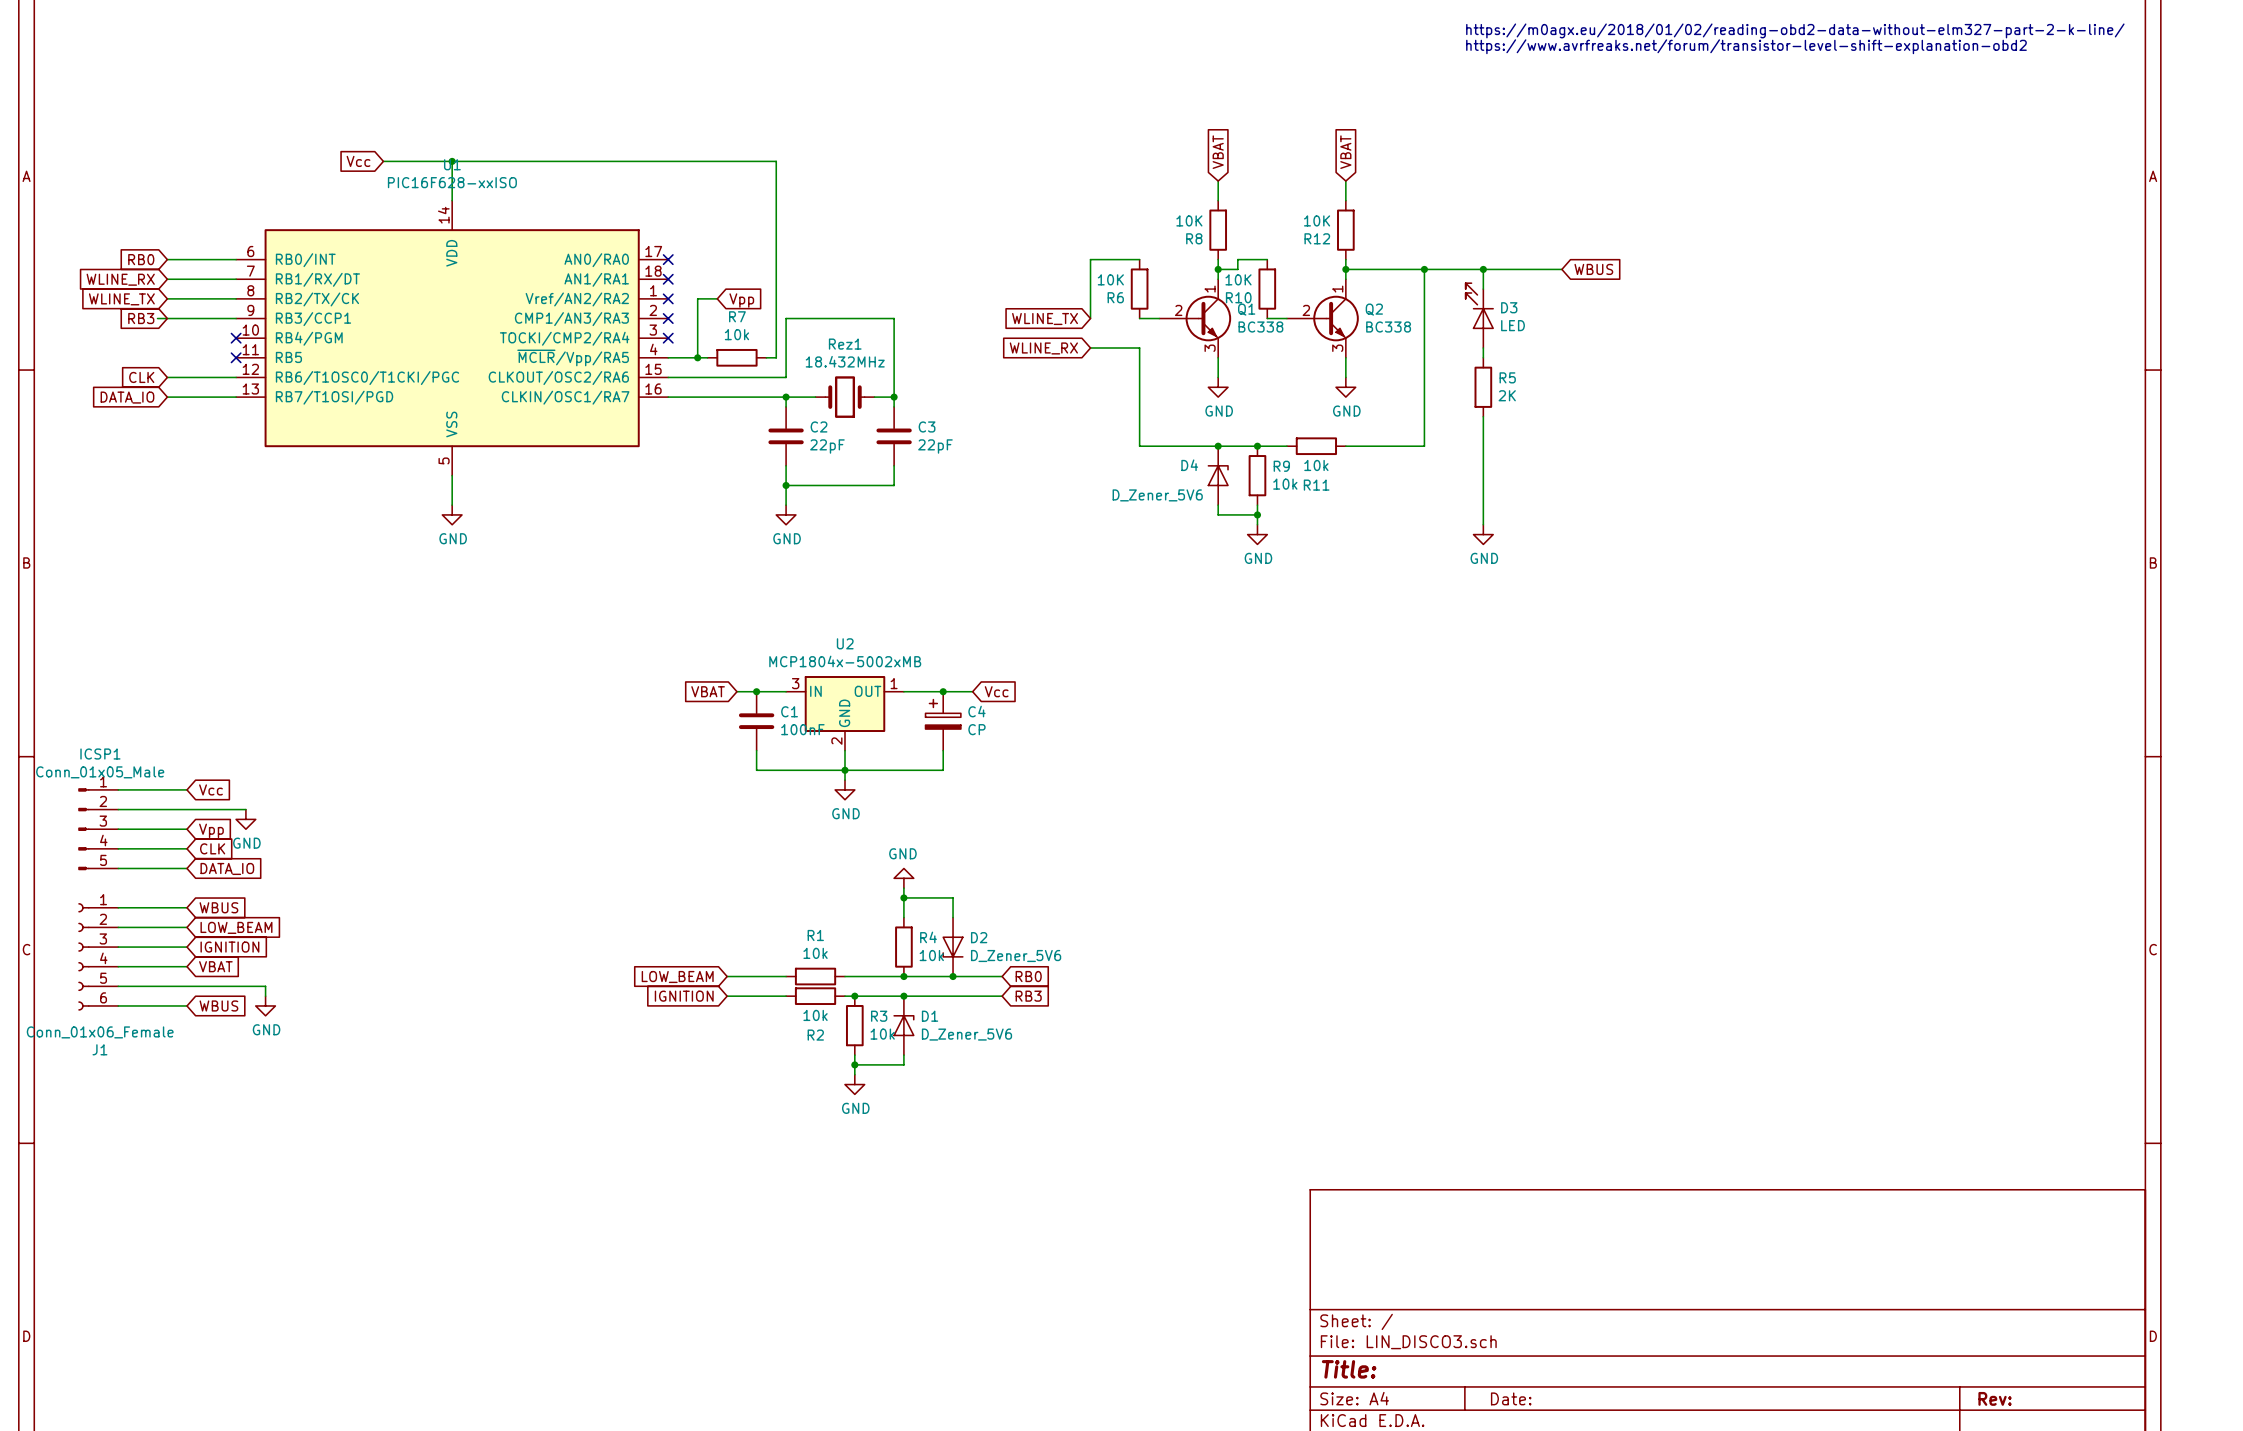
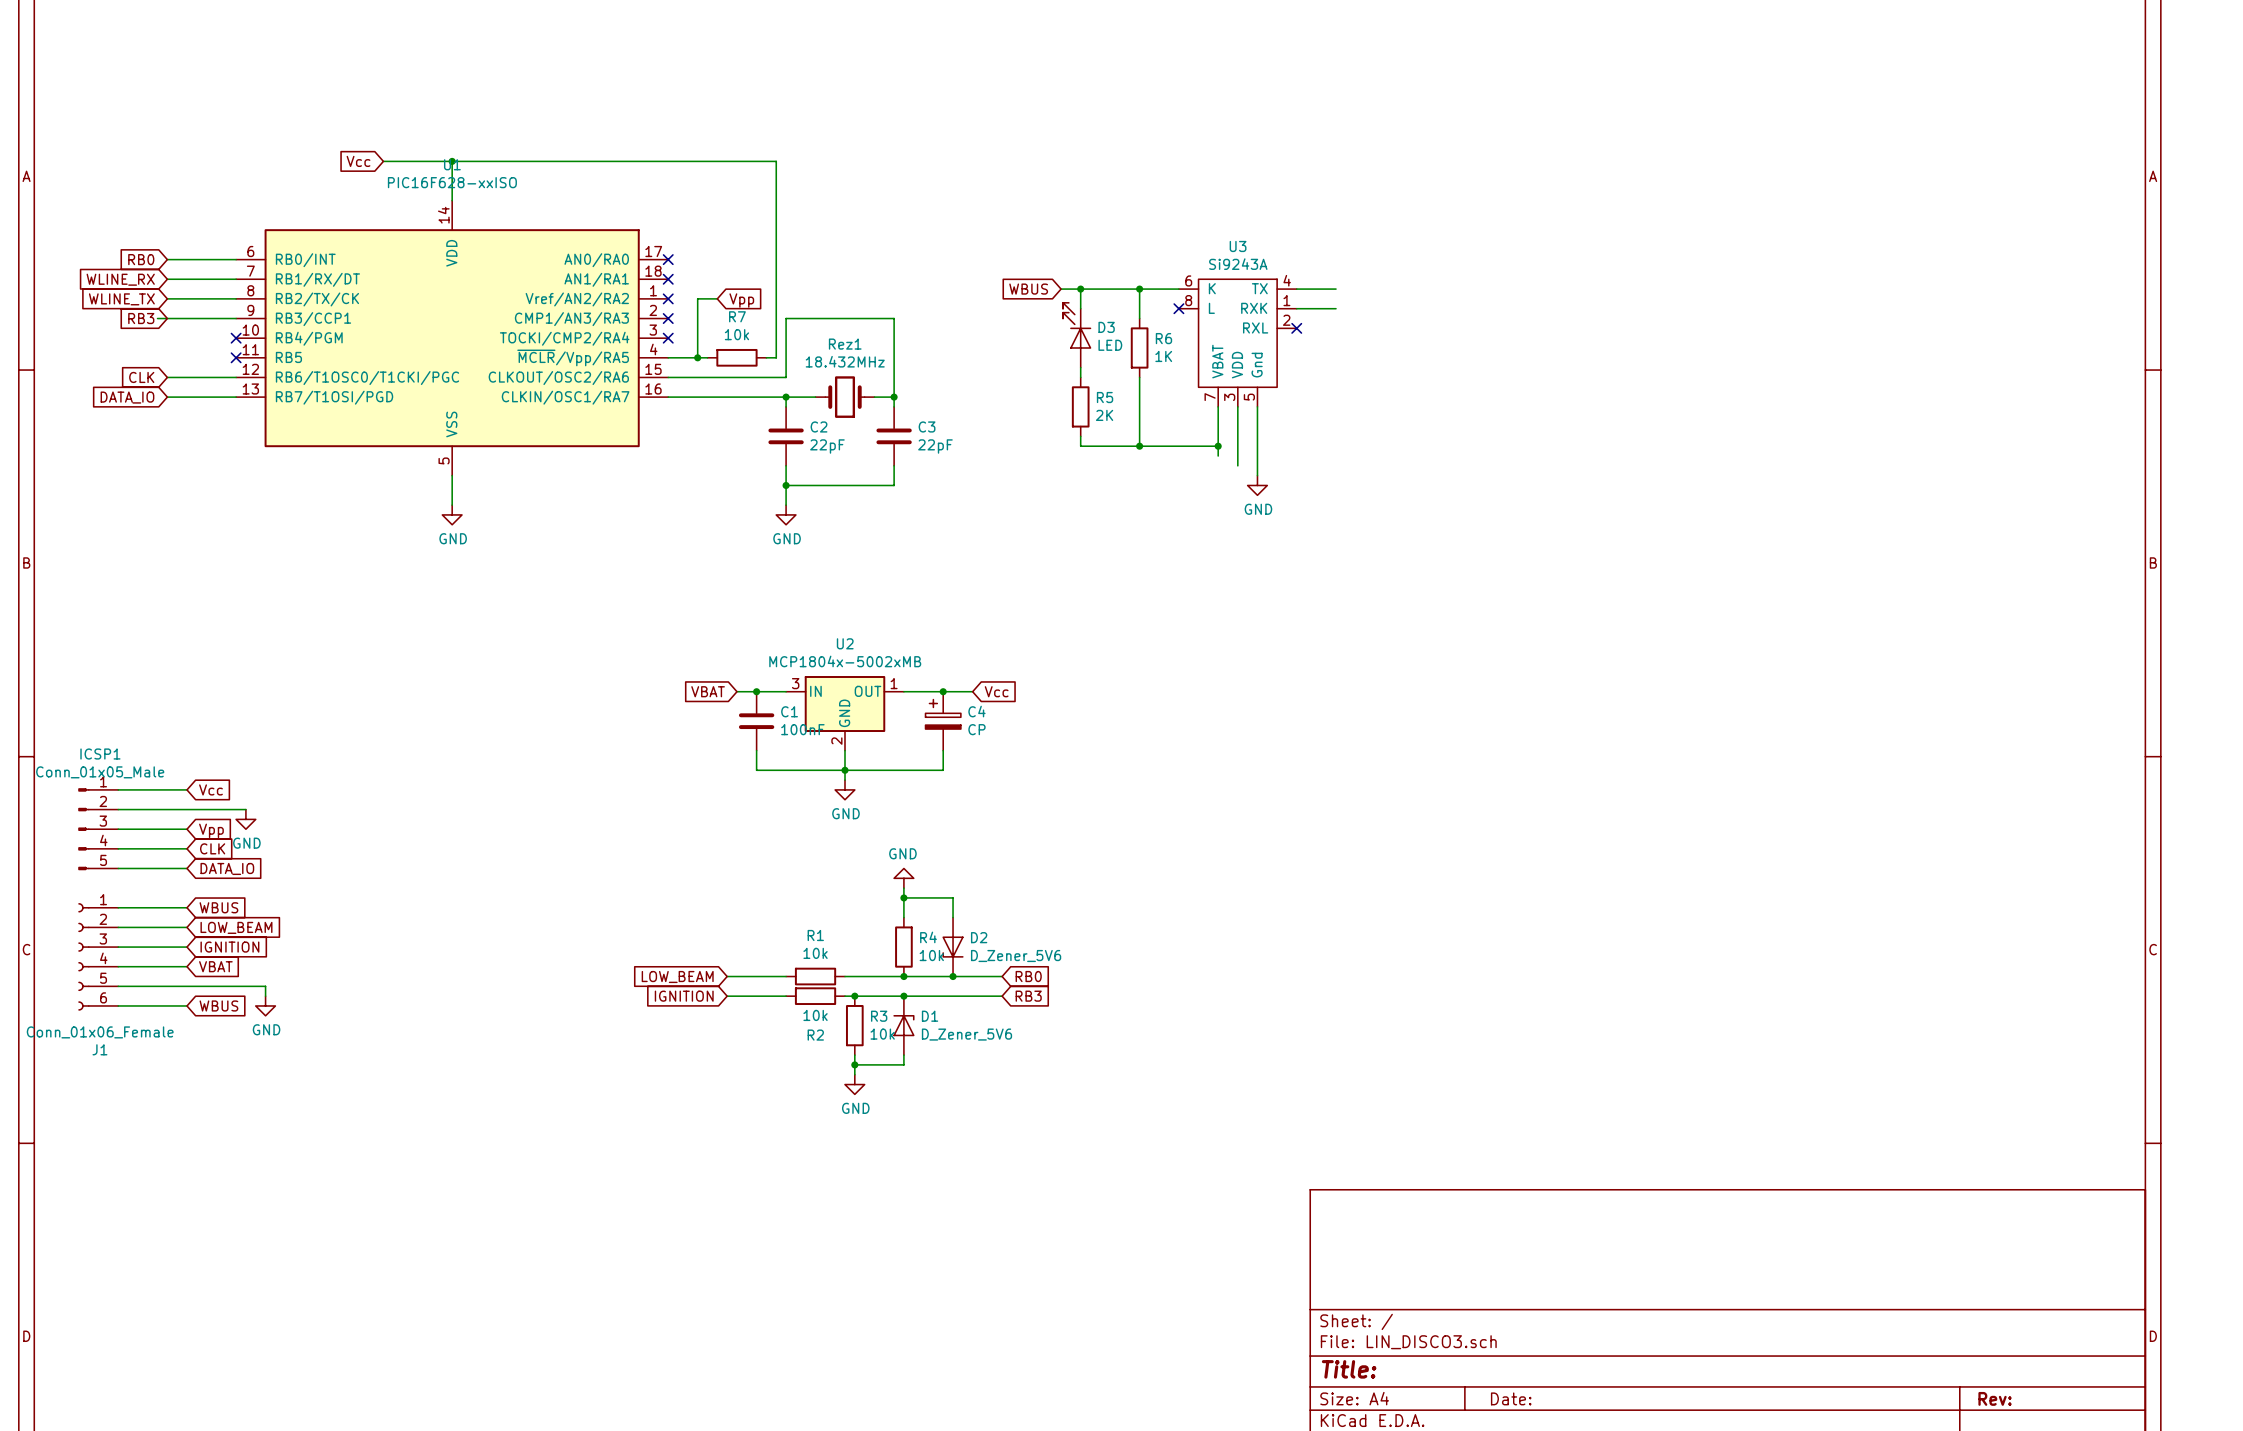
text: https://m0agx.eu/2018/01/02/reading-obd2-data-without-elm327-part-2-k-line/ (1795, 30) -> none
text: https://www.avrfreaks.net/forum/transistor-level-shift-explanation-obd2 (1746, 46) -> none
global label: VBAT (1218, 152) -> none
global label: VBAT (1345, 152) -> none
wire: (1218, 181) (1218, 200) -> none
wire: (1345, 181) (1345, 200) -> none
R8: 10K (1218, 230) -> none
R12: 10K (1345, 230) -> none
wire: (1139, 259) (1090, 259) (1090, 318) -> none
wire: (1218, 259) (1218, 279) -> (1080, 289) (1080, 308)
wire: (1267, 259) (1237, 259) (1237, 269) (1218, 269) -> none
wire: (1345, 259) (1345, 279) -> none
junction: (1218, 269) -> none
wire: (1345, 269) (1561, 269) -> none
junction: (1345, 269) -> none
wire: (1424, 269) (1424, 446) (1345, 446) -> none
junction: (1424, 269) -> none
wire: (1483, 269) (1483, 289) -> none
junction: (1483, 269) -> none
global label: WBUS (1593, 269) -> none
R6 value: 10K (1110, 279) -> 1K (1163, 356)
global label: none -> WBUS (1028, 289)
wire: none -> (1061, 289) (1178, 289)
junction: none -> (1080, 289)
R6 position: (1139, 289) -> (1139, 347)
junction: none -> (1139, 289)
R10: 10K (1267, 289) -> none
wire: none -> (1296, 289) (1336, 289)
R6 name position: R6 (1115, 297) -> R6 (1163, 338)
no-connect mark: none -> (1178, 308)
wire: none -> (1296, 308) (1336, 308)
D3 position: (1479, 315) -> (1077, 335)
wire: (1139, 318) (1159, 318) -> (1139, 318) (1139, 289)
Q1: BC338 (1195, 318) -> none
wire: (1267, 318) (1286, 318) -> none
Q2: BC338 (1322, 318) -> none
global label: WLINE_TX (1045, 319) -> none
no-connect mark: none -> (1296, 328)
U3: none -> Si9243A (1237, 343)
wire: (1090, 347) (1139, 347) (1139, 377) -> none
wire: (1483, 347) (1483, 357) -> none
global label: WLINE_RX (1043, 348) -> none
wire: (1218, 357) (1218, 377) -> none
wire: (1345, 357) (1345, 377) -> none
wire: none -> (1080, 367) (1080, 377)
power symbol: GND (1218, 387) -> none
power symbol: GND (1345, 387) -> none
R5 position: (1483, 387) -> (1080, 406)
wire: none -> (1218, 406) (1218, 456)
wire: none -> (1237, 406) (1237, 465)
wire: none -> (1257, 406) (1257, 475)
wire: (1483, 416) (1483, 524) -> none
wire: none -> (1080, 436) (1080, 446) (1139, 446)
junction: none -> (1139, 446)
wire: (1218, 446) (1286, 446) -> none
junction: (1257, 446) -> none
R11: 10k (1316, 446) -> none
D4: D_Zener_5V6 (1218, 475) -> none
R9: 10k (1257, 475) -> none
wire: (1218, 505) (1218, 514) (1257, 514) -> none
wire: (1257, 505) (1257, 524) -> none
junction: (1257, 514) -> none
power symbol position: GND (1257, 534) -> GND (1257, 485)
power symbol: GND (1483, 534) -> none

